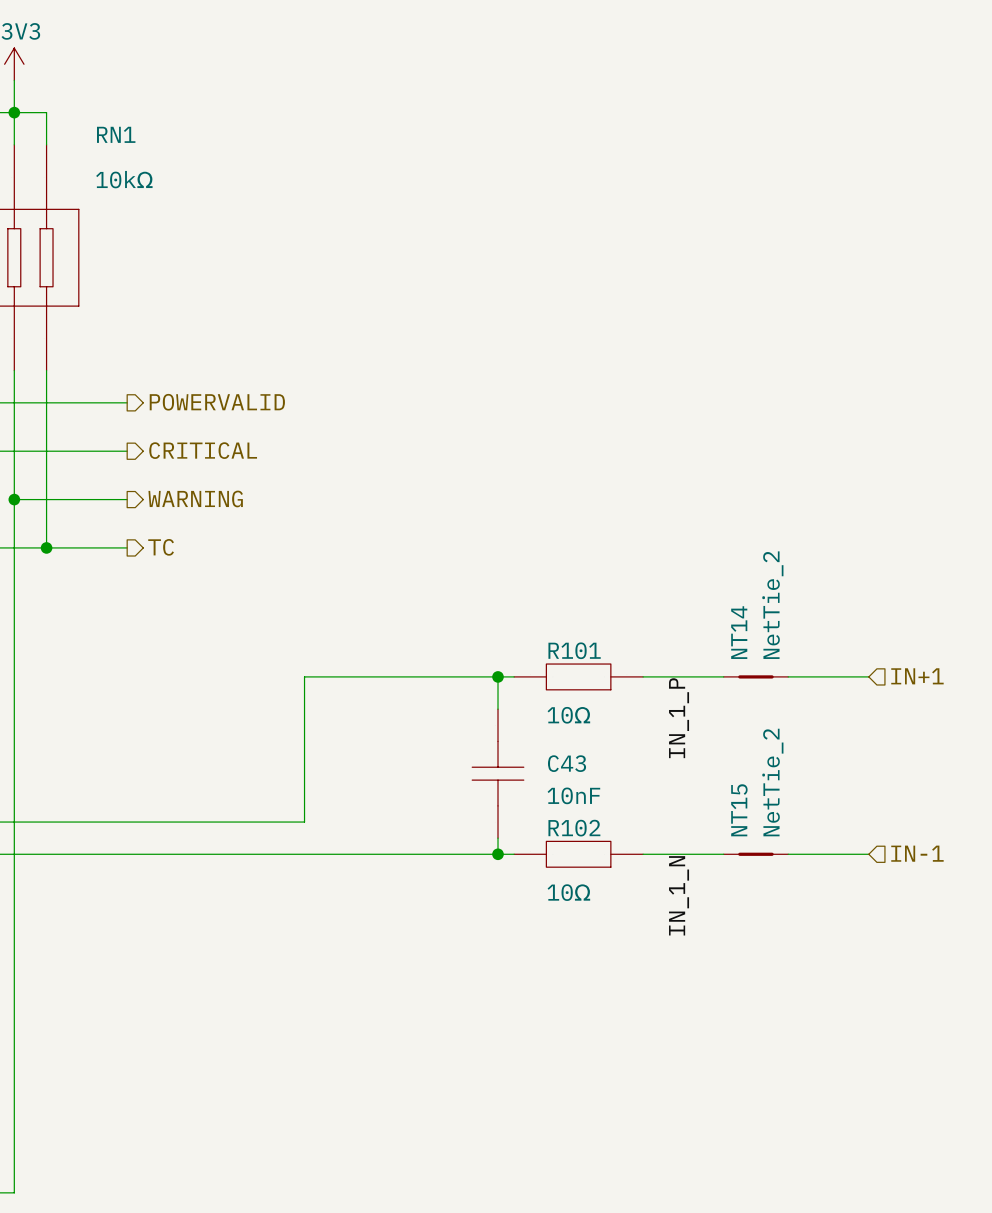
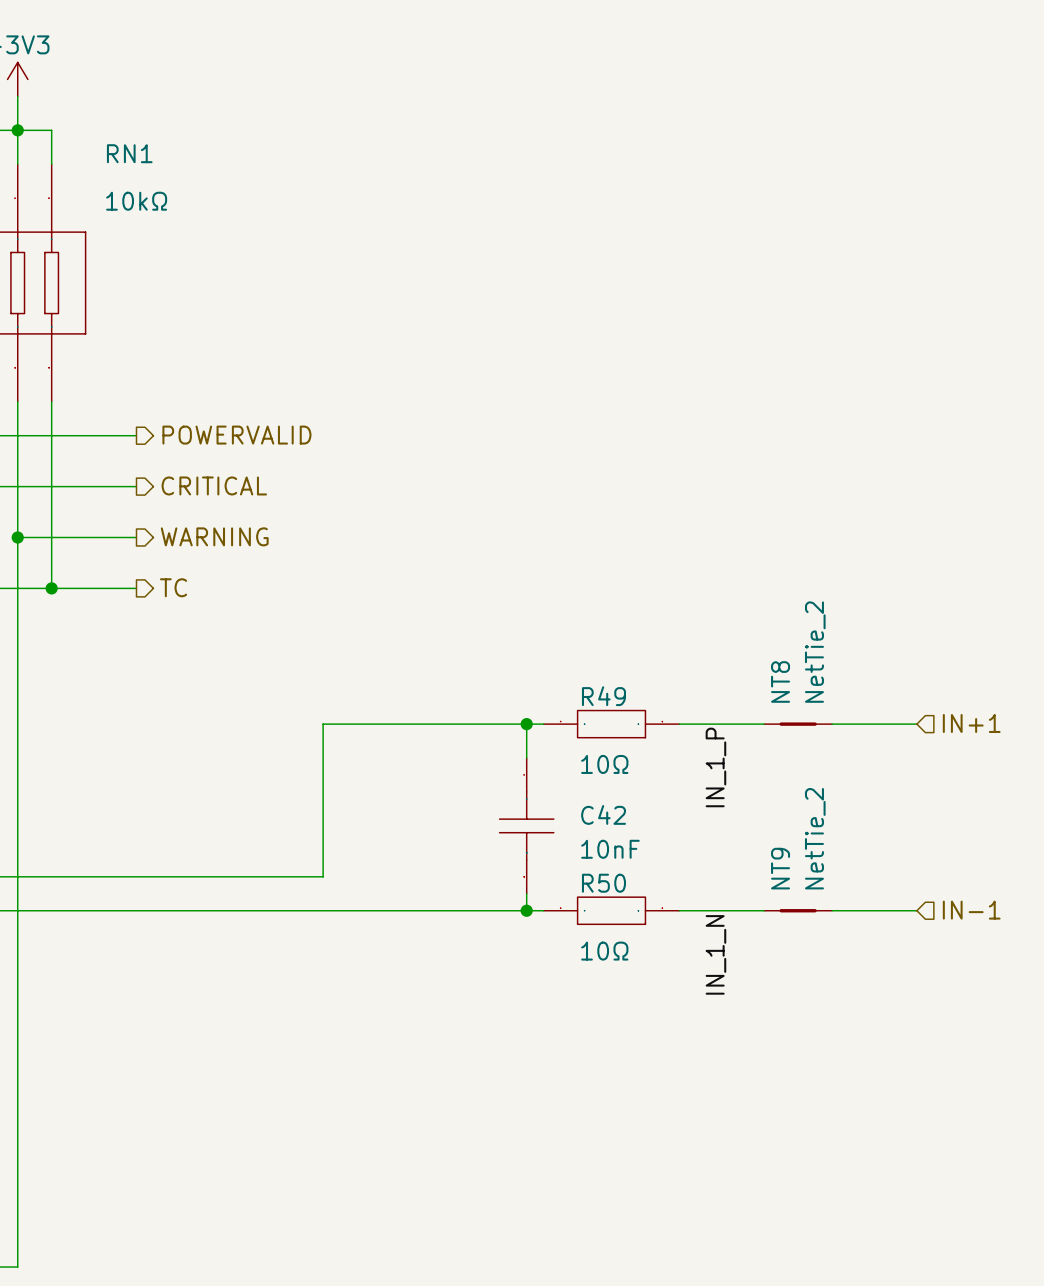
NT14 name: NT14 (739, 632) -> NT8 (780, 681)
R101 name: R101 (574, 650) -> R49 (603, 696)
C43 name: C43 (567, 763) -> C42 (603, 814)
NT15 name: NT15 (739, 810) -> NT9 (780, 868)
R102 name: R102 (574, 828) -> R50 (603, 883)

